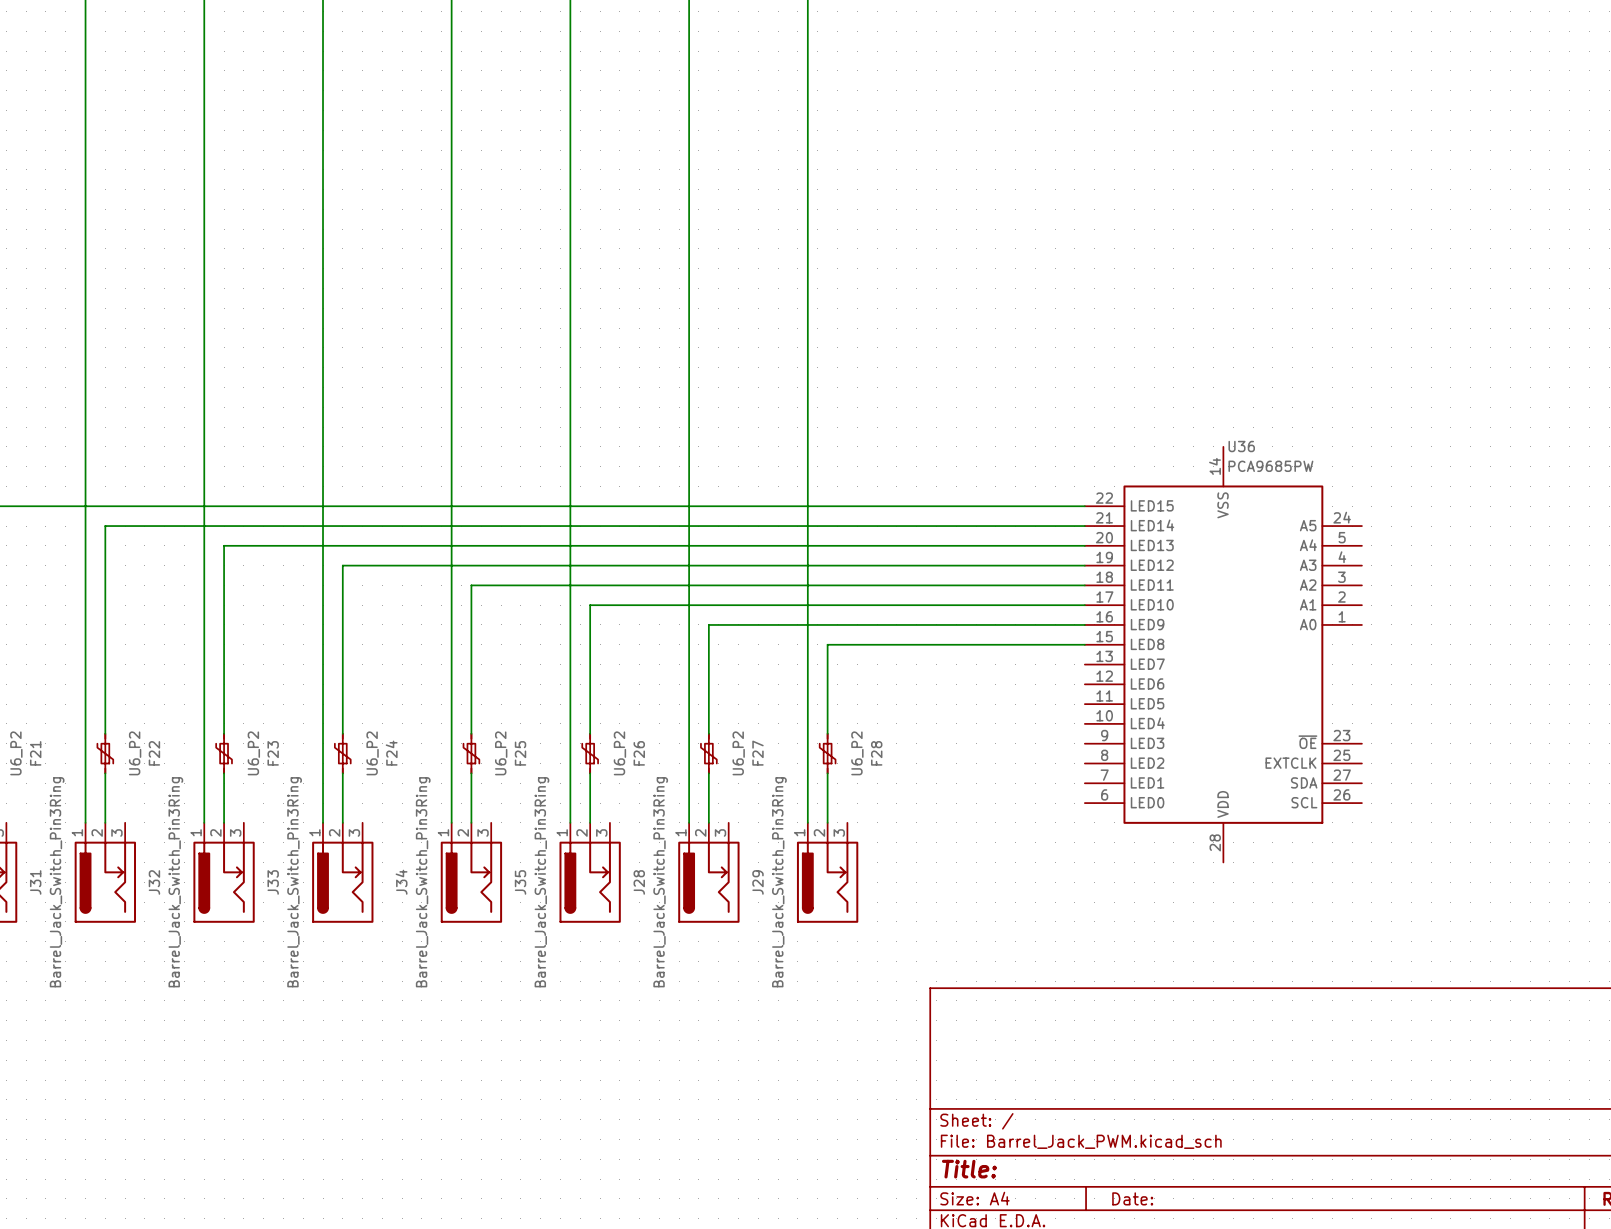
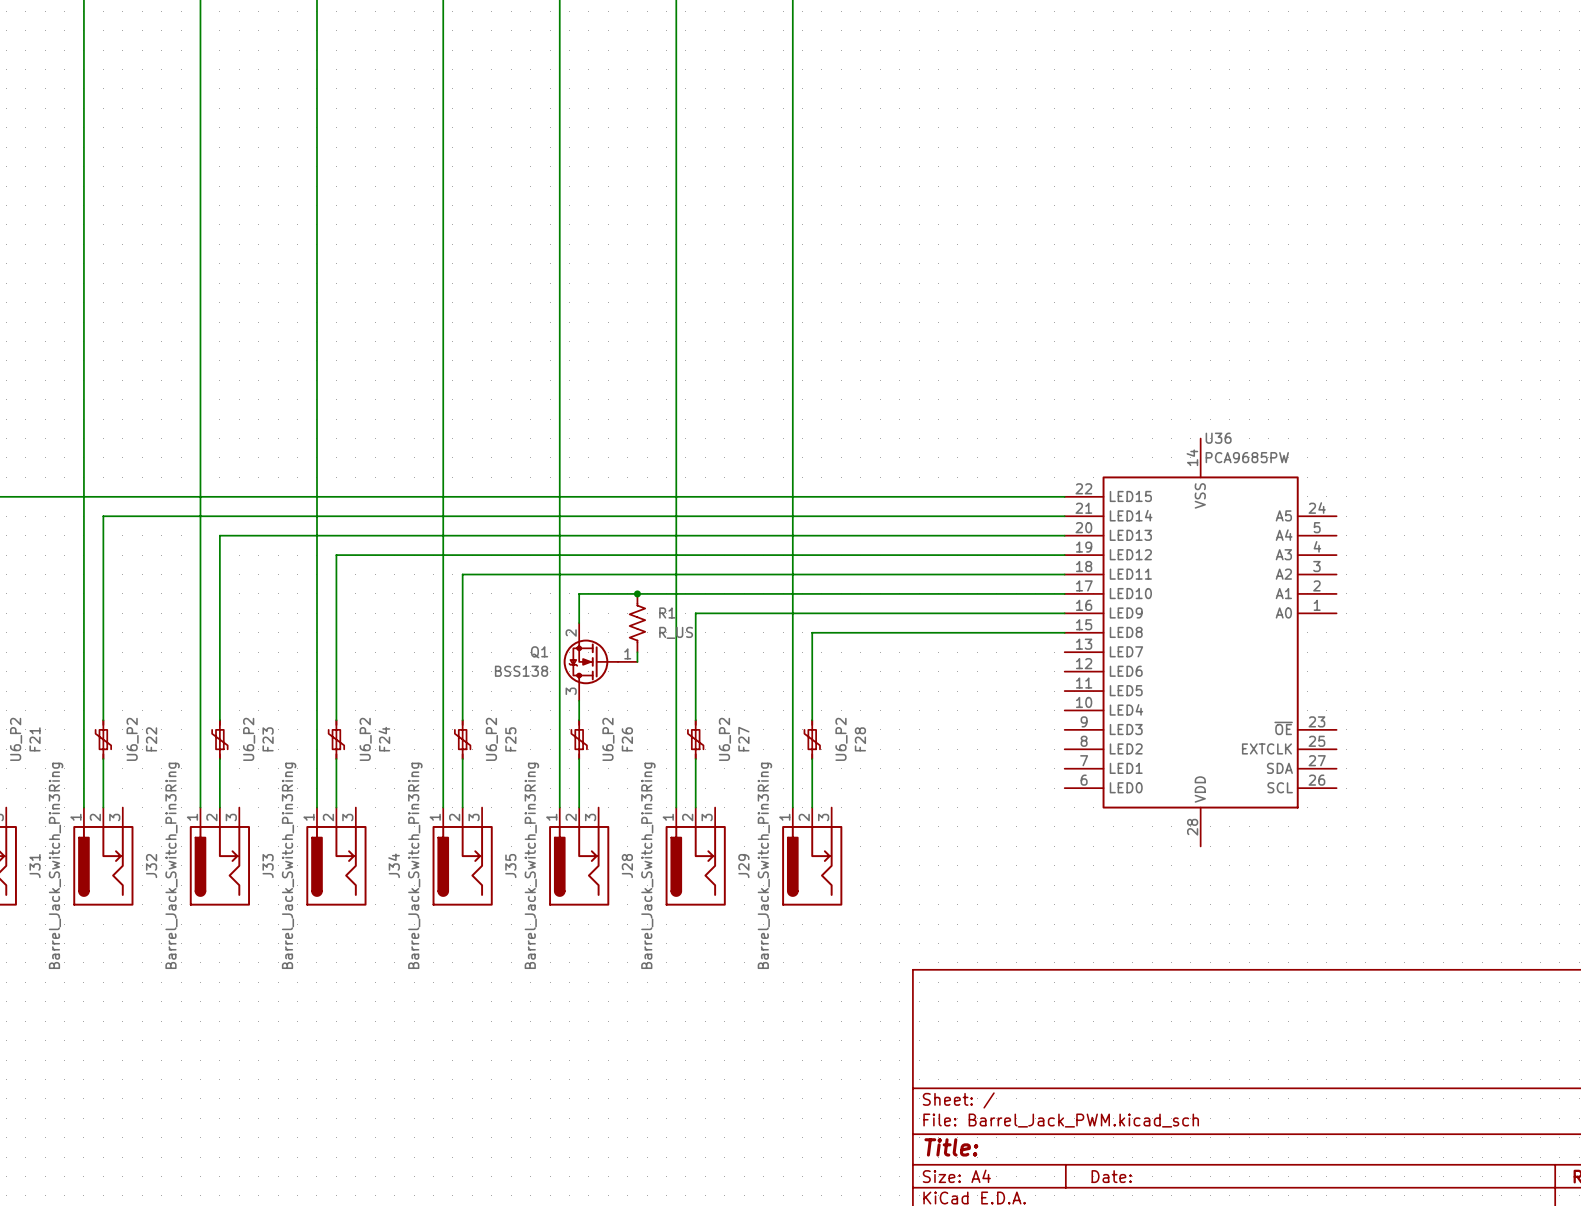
junction: none -> (637, 593)
R1: none -> R_US (637, 623)
wire: none -> (637, 652) (637, 661)
Q1: none -> BSS138 (600, 661)

